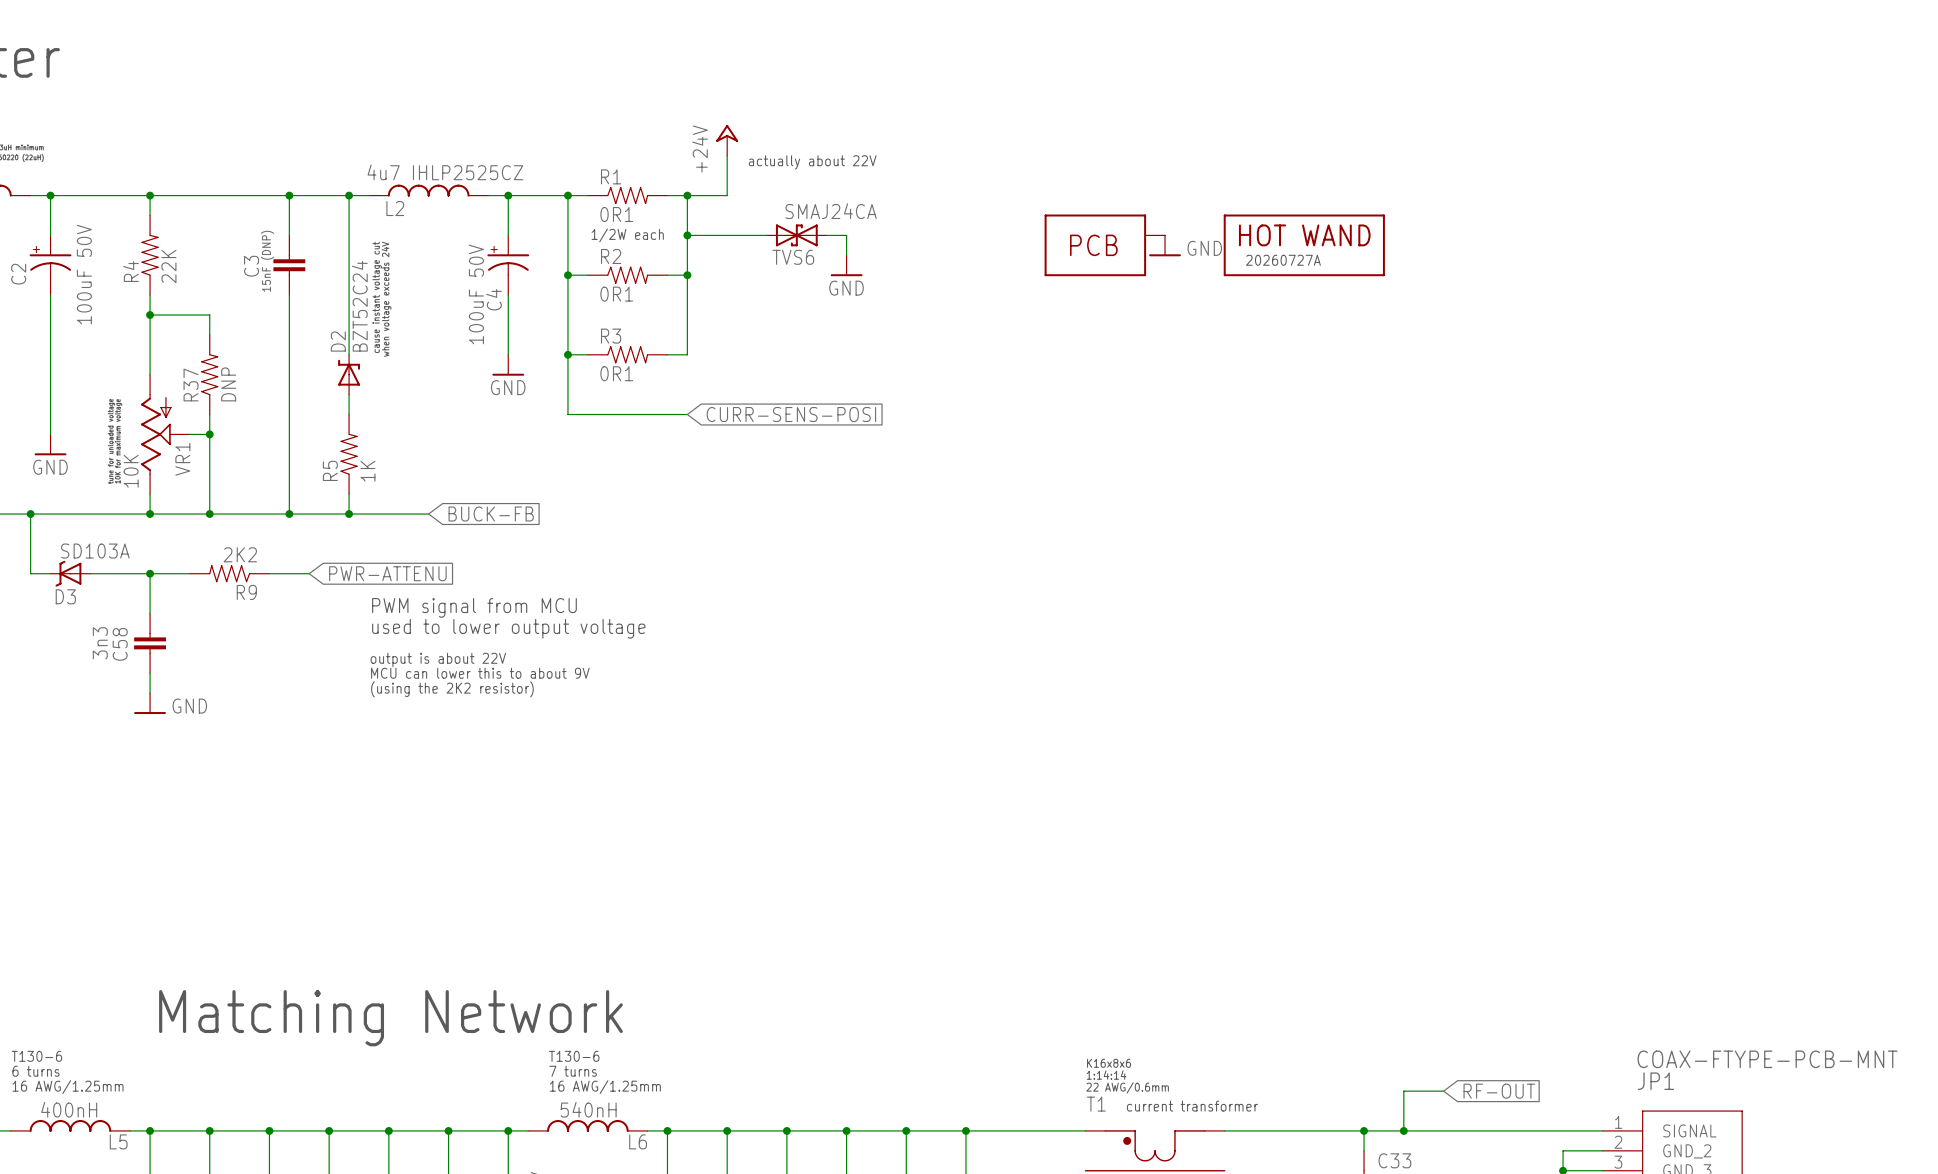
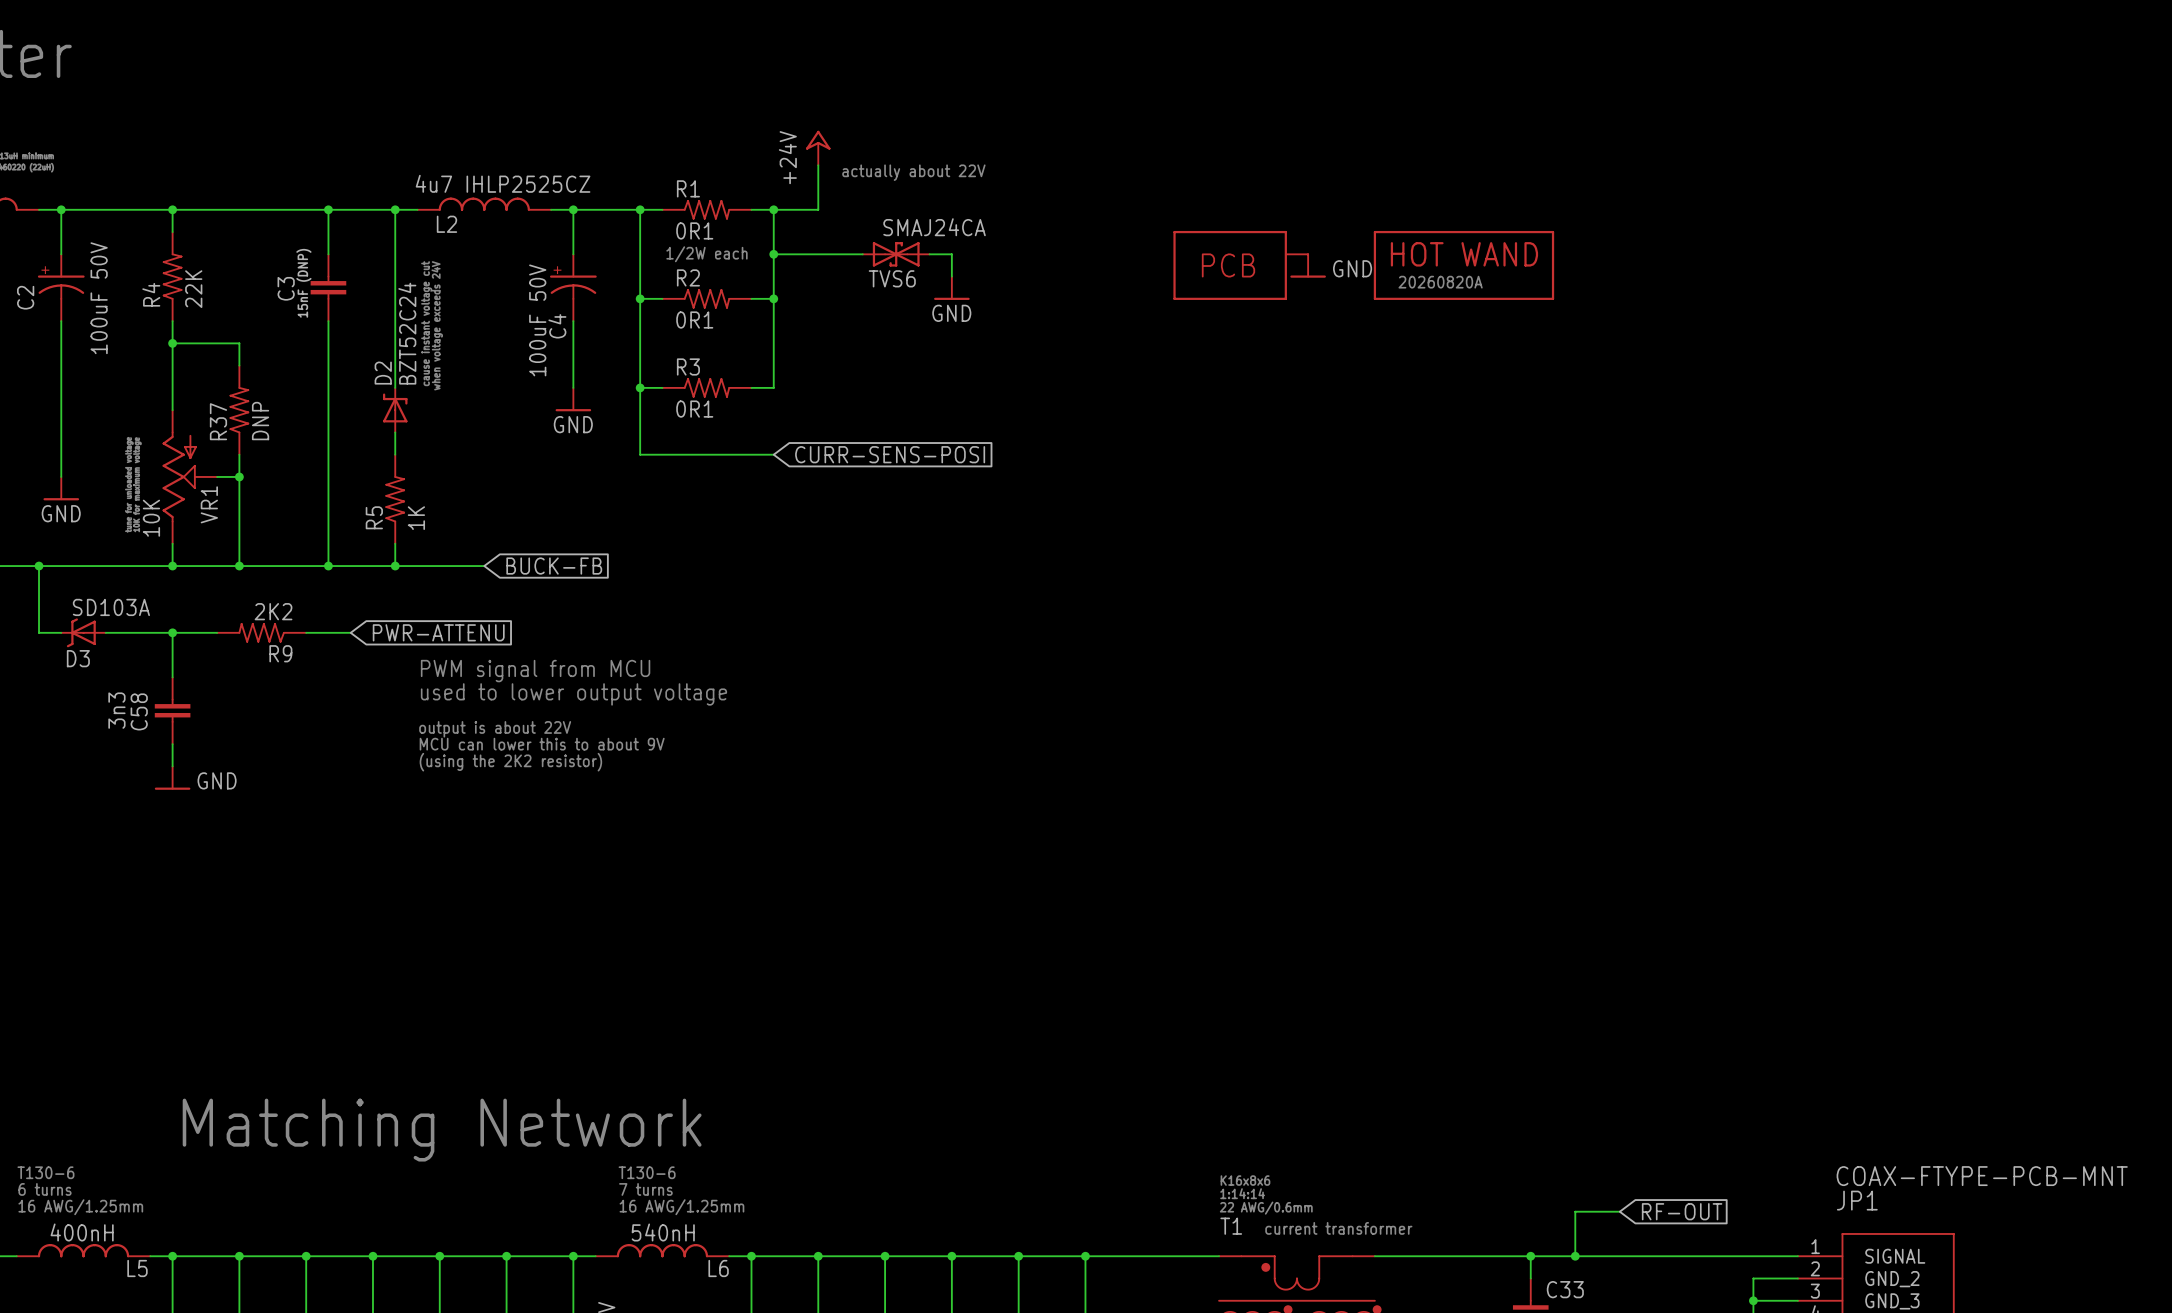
part text: 20260727A (1283, 260) -> 20260820A (1440, 282)

